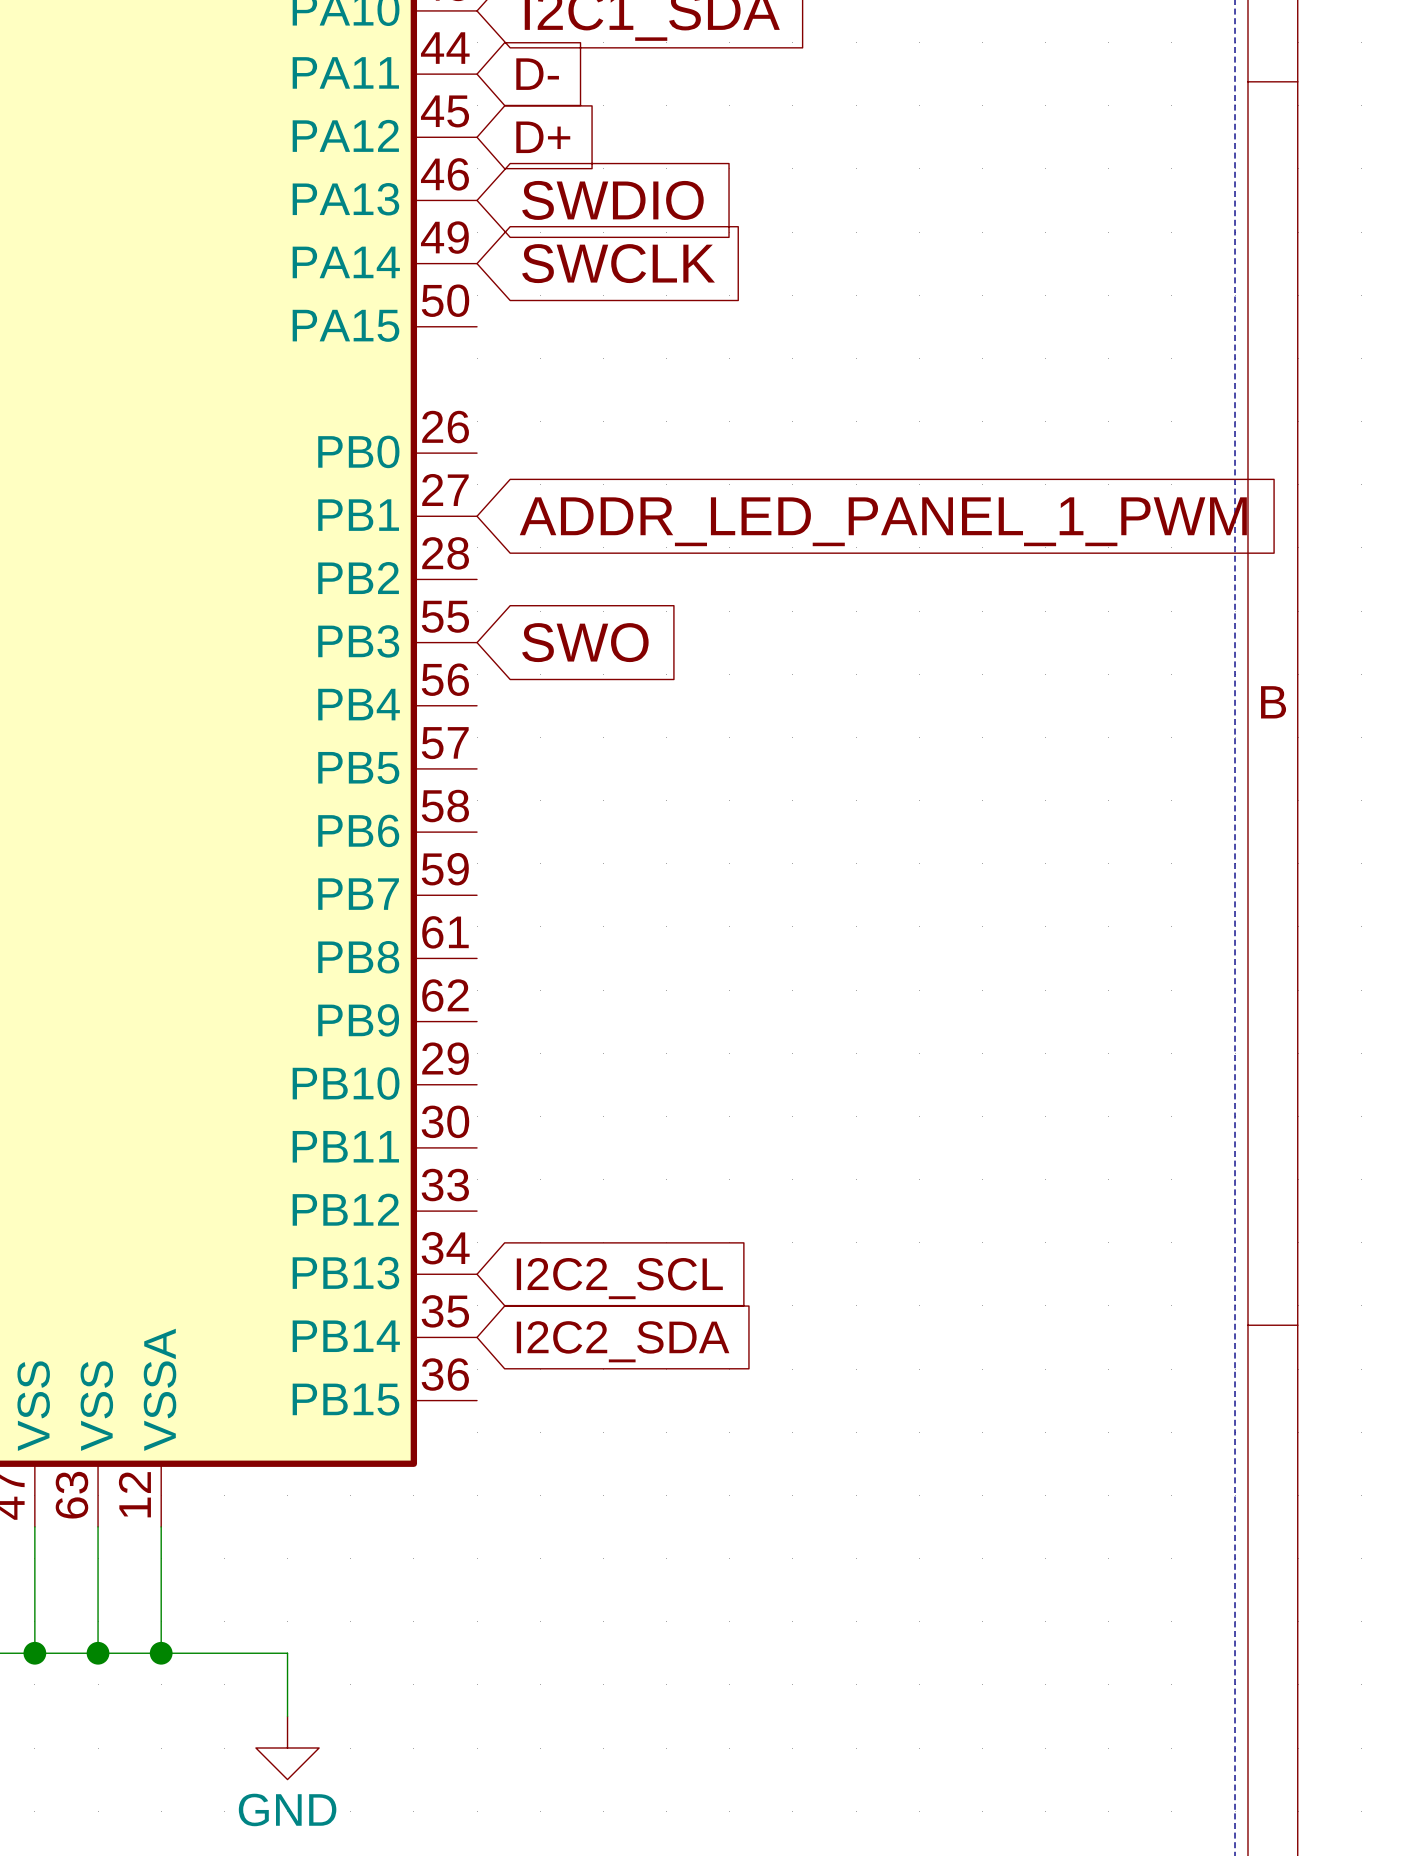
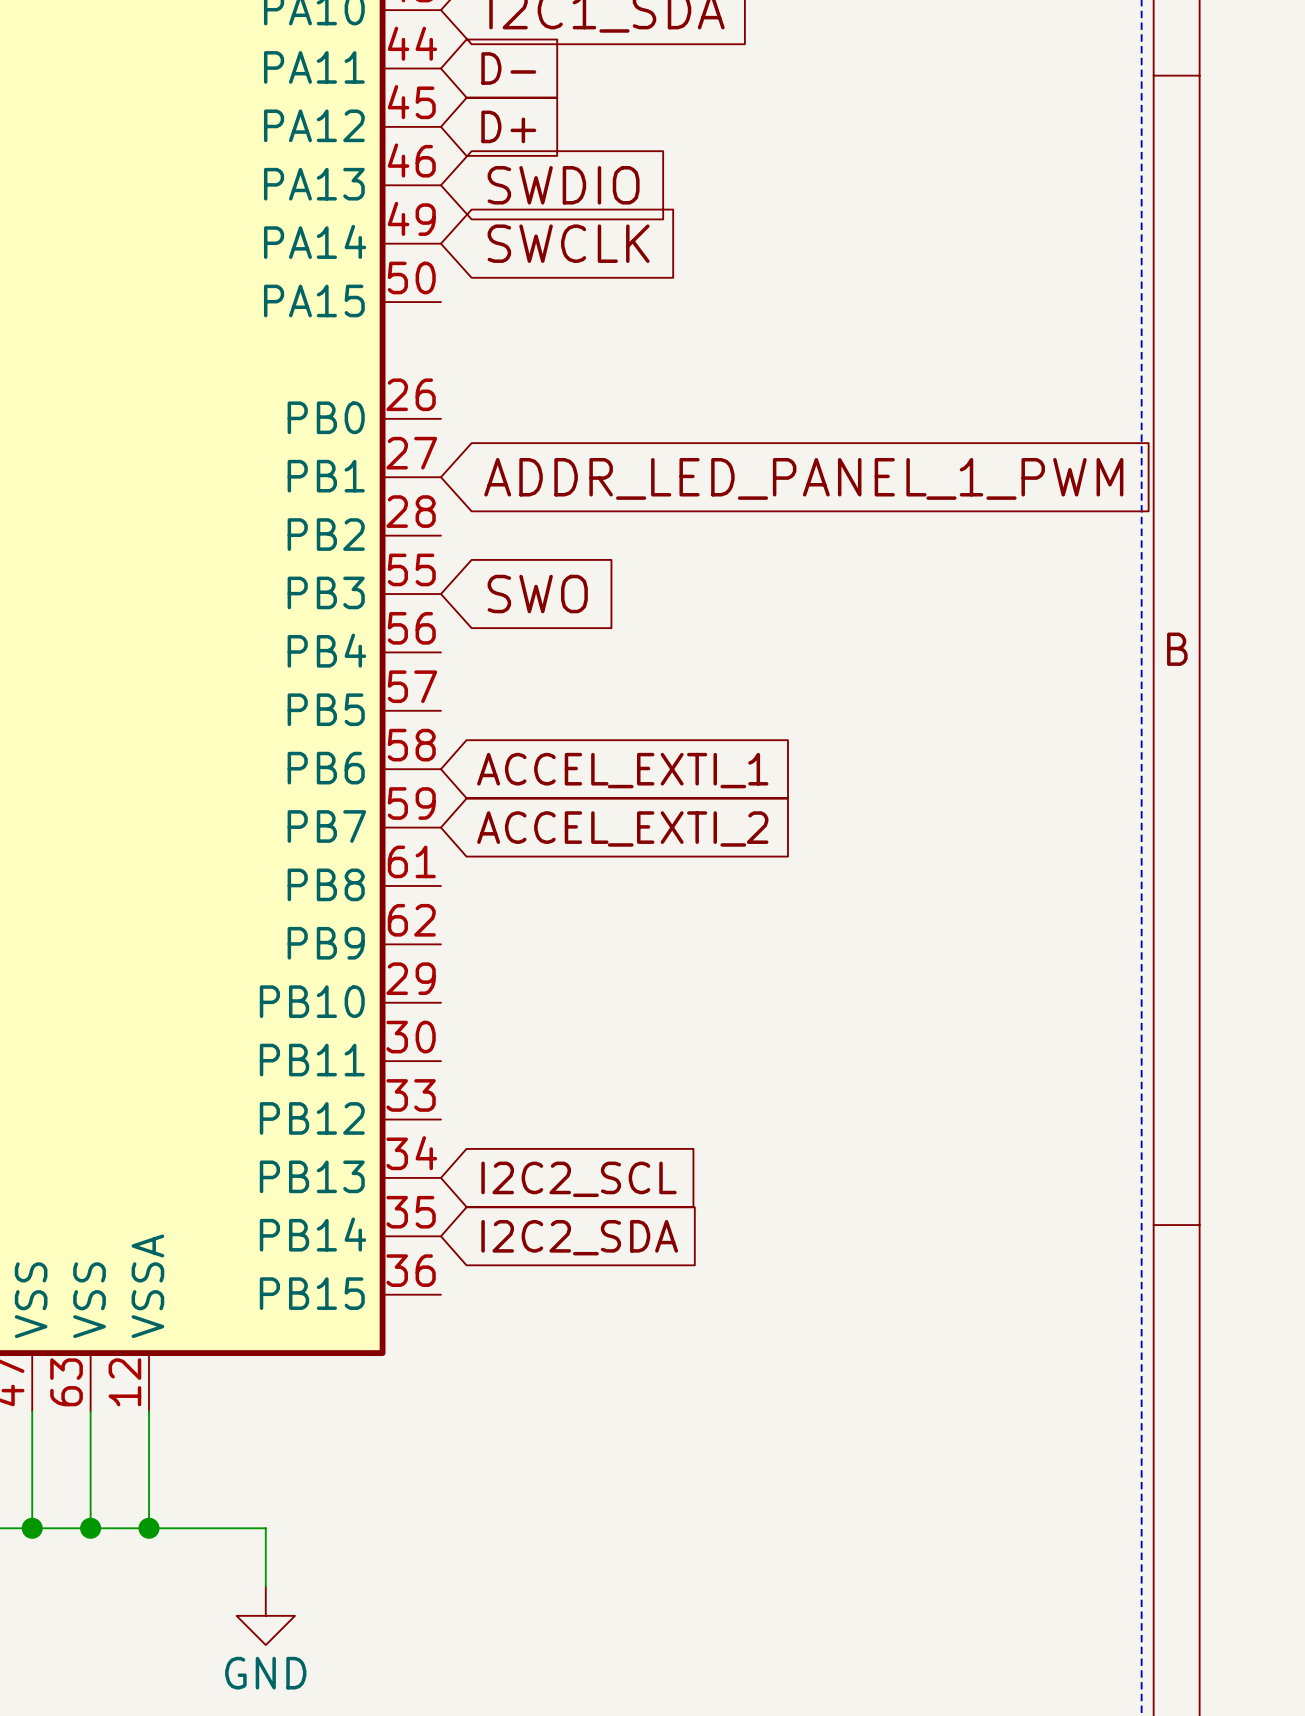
global label: none -> ACCEL_EXTI_1 (622, 770)
global label: none -> ACCEL_EXTI_2 (622, 828)

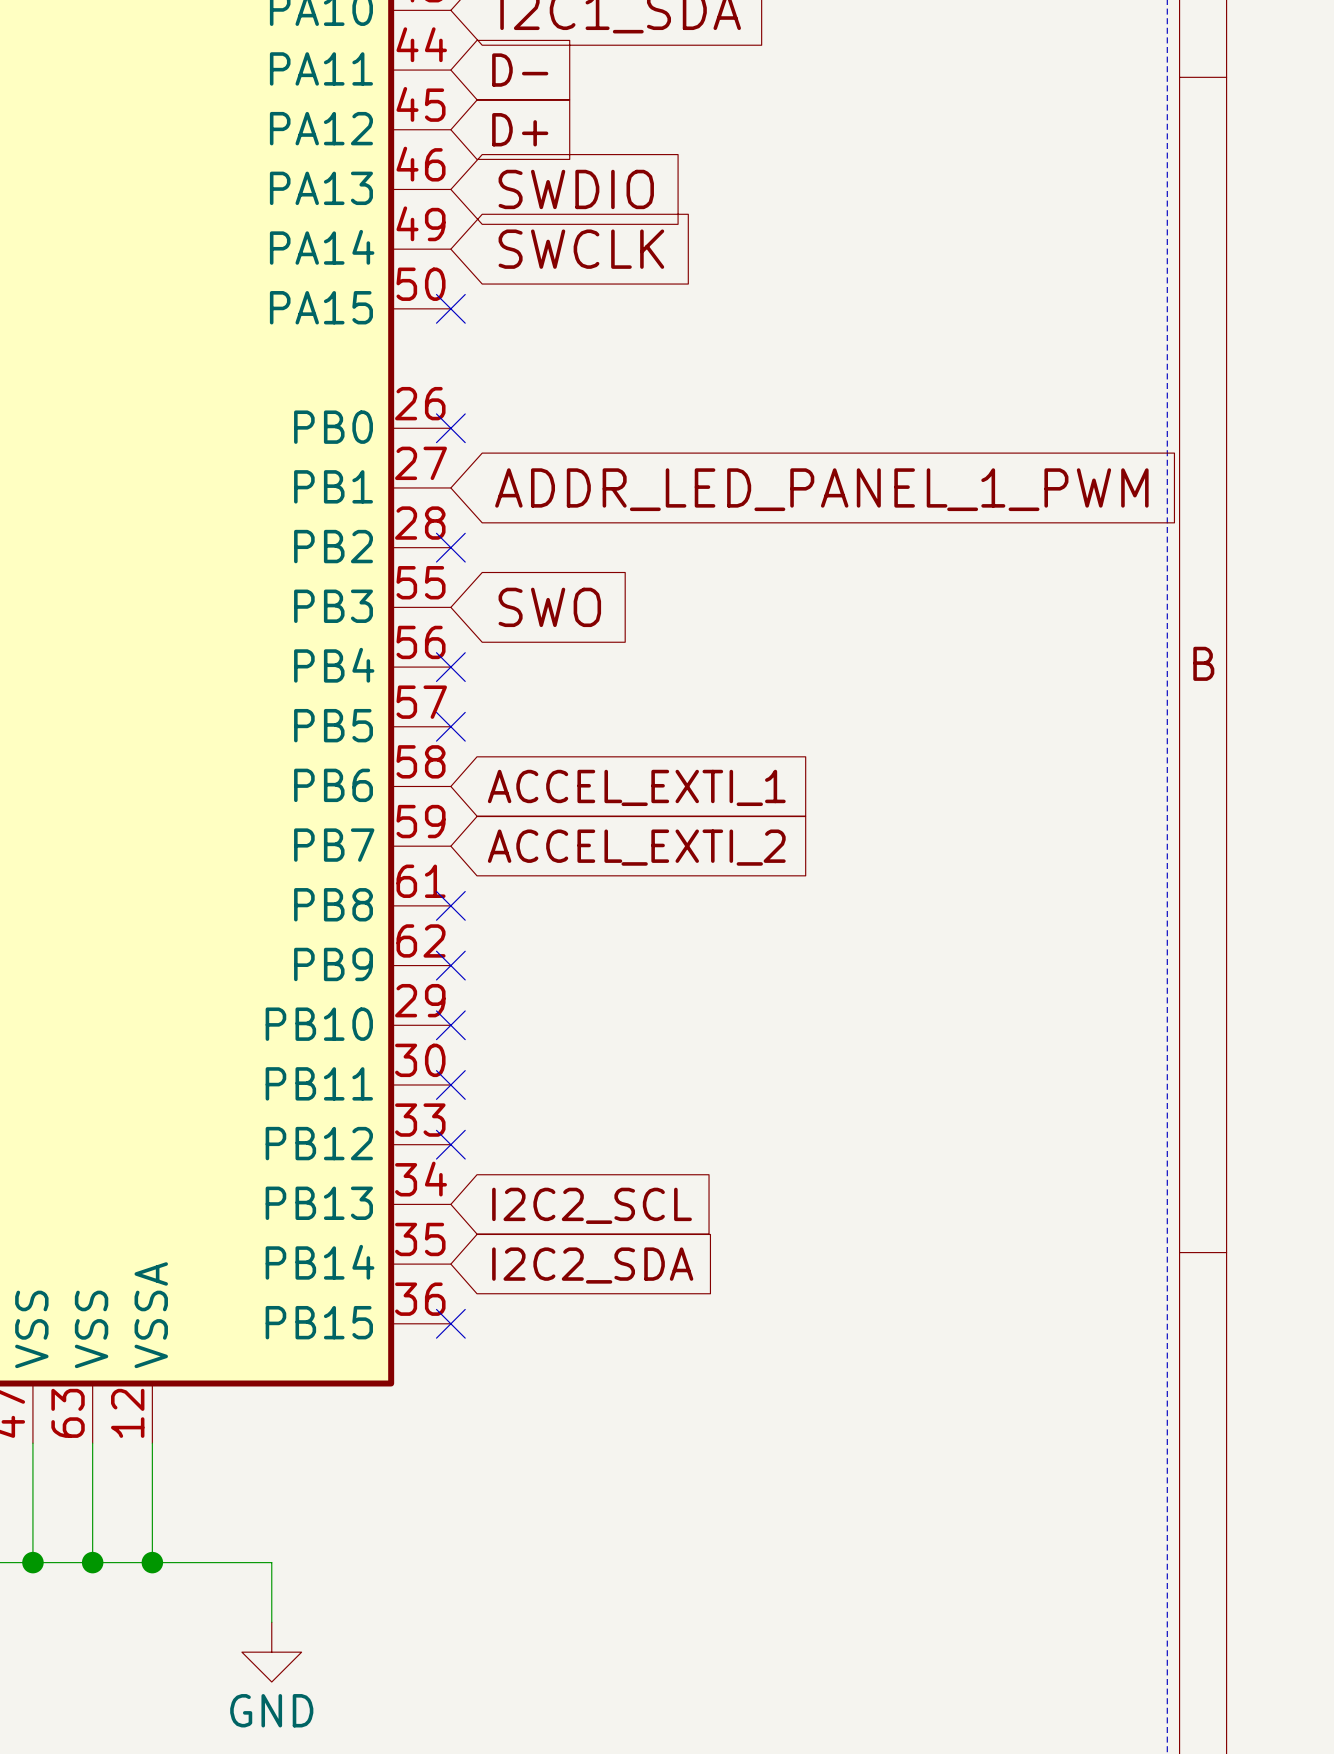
no-connect mark: none -> (450, 308)
no-connect mark: none -> (450, 428)
no-connect mark: none -> (450, 547)
no-connect mark: none -> (450, 667)
no-connect mark: none -> (450, 726)
no-connect mark: none -> (450, 905)
no-connect mark: none -> (450, 965)
no-connect mark: none -> (450, 1025)
no-connect mark: none -> (450, 1084)
no-connect mark: none -> (450, 1144)
no-connect mark: none -> (450, 1323)

